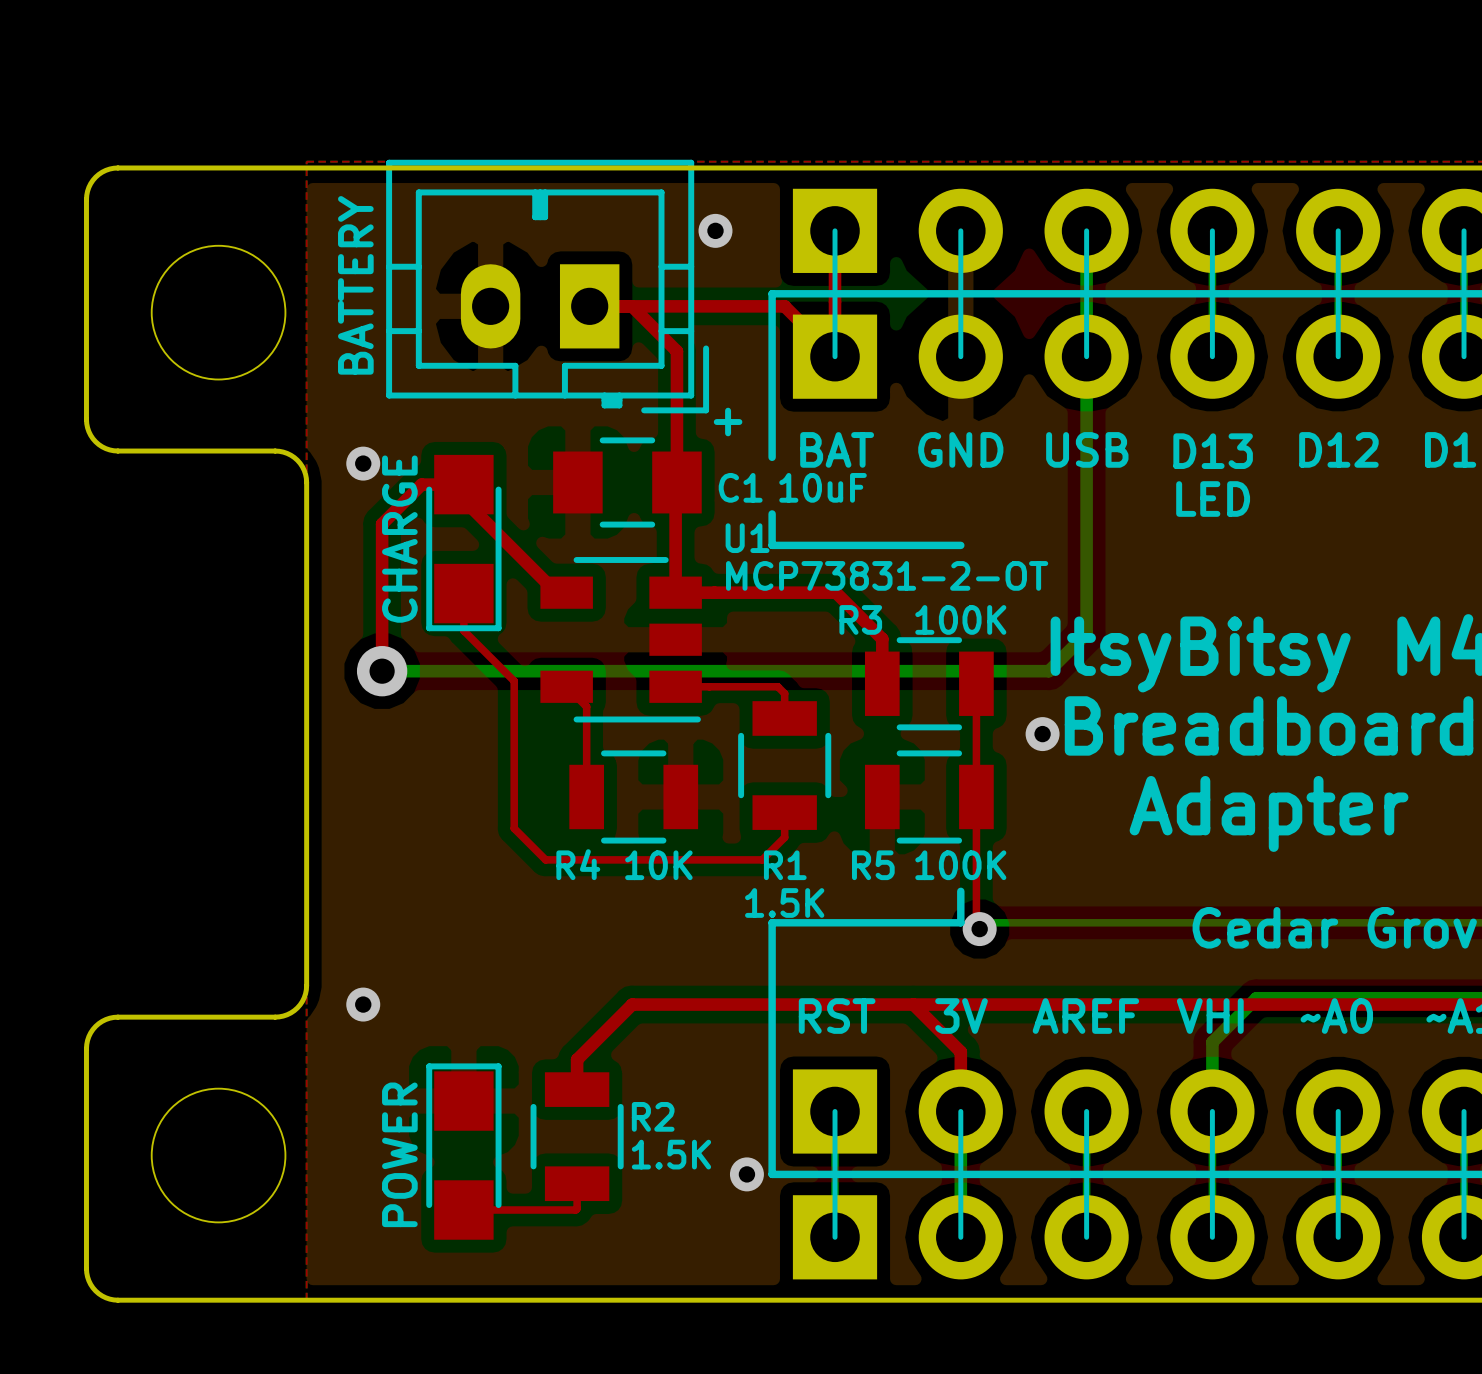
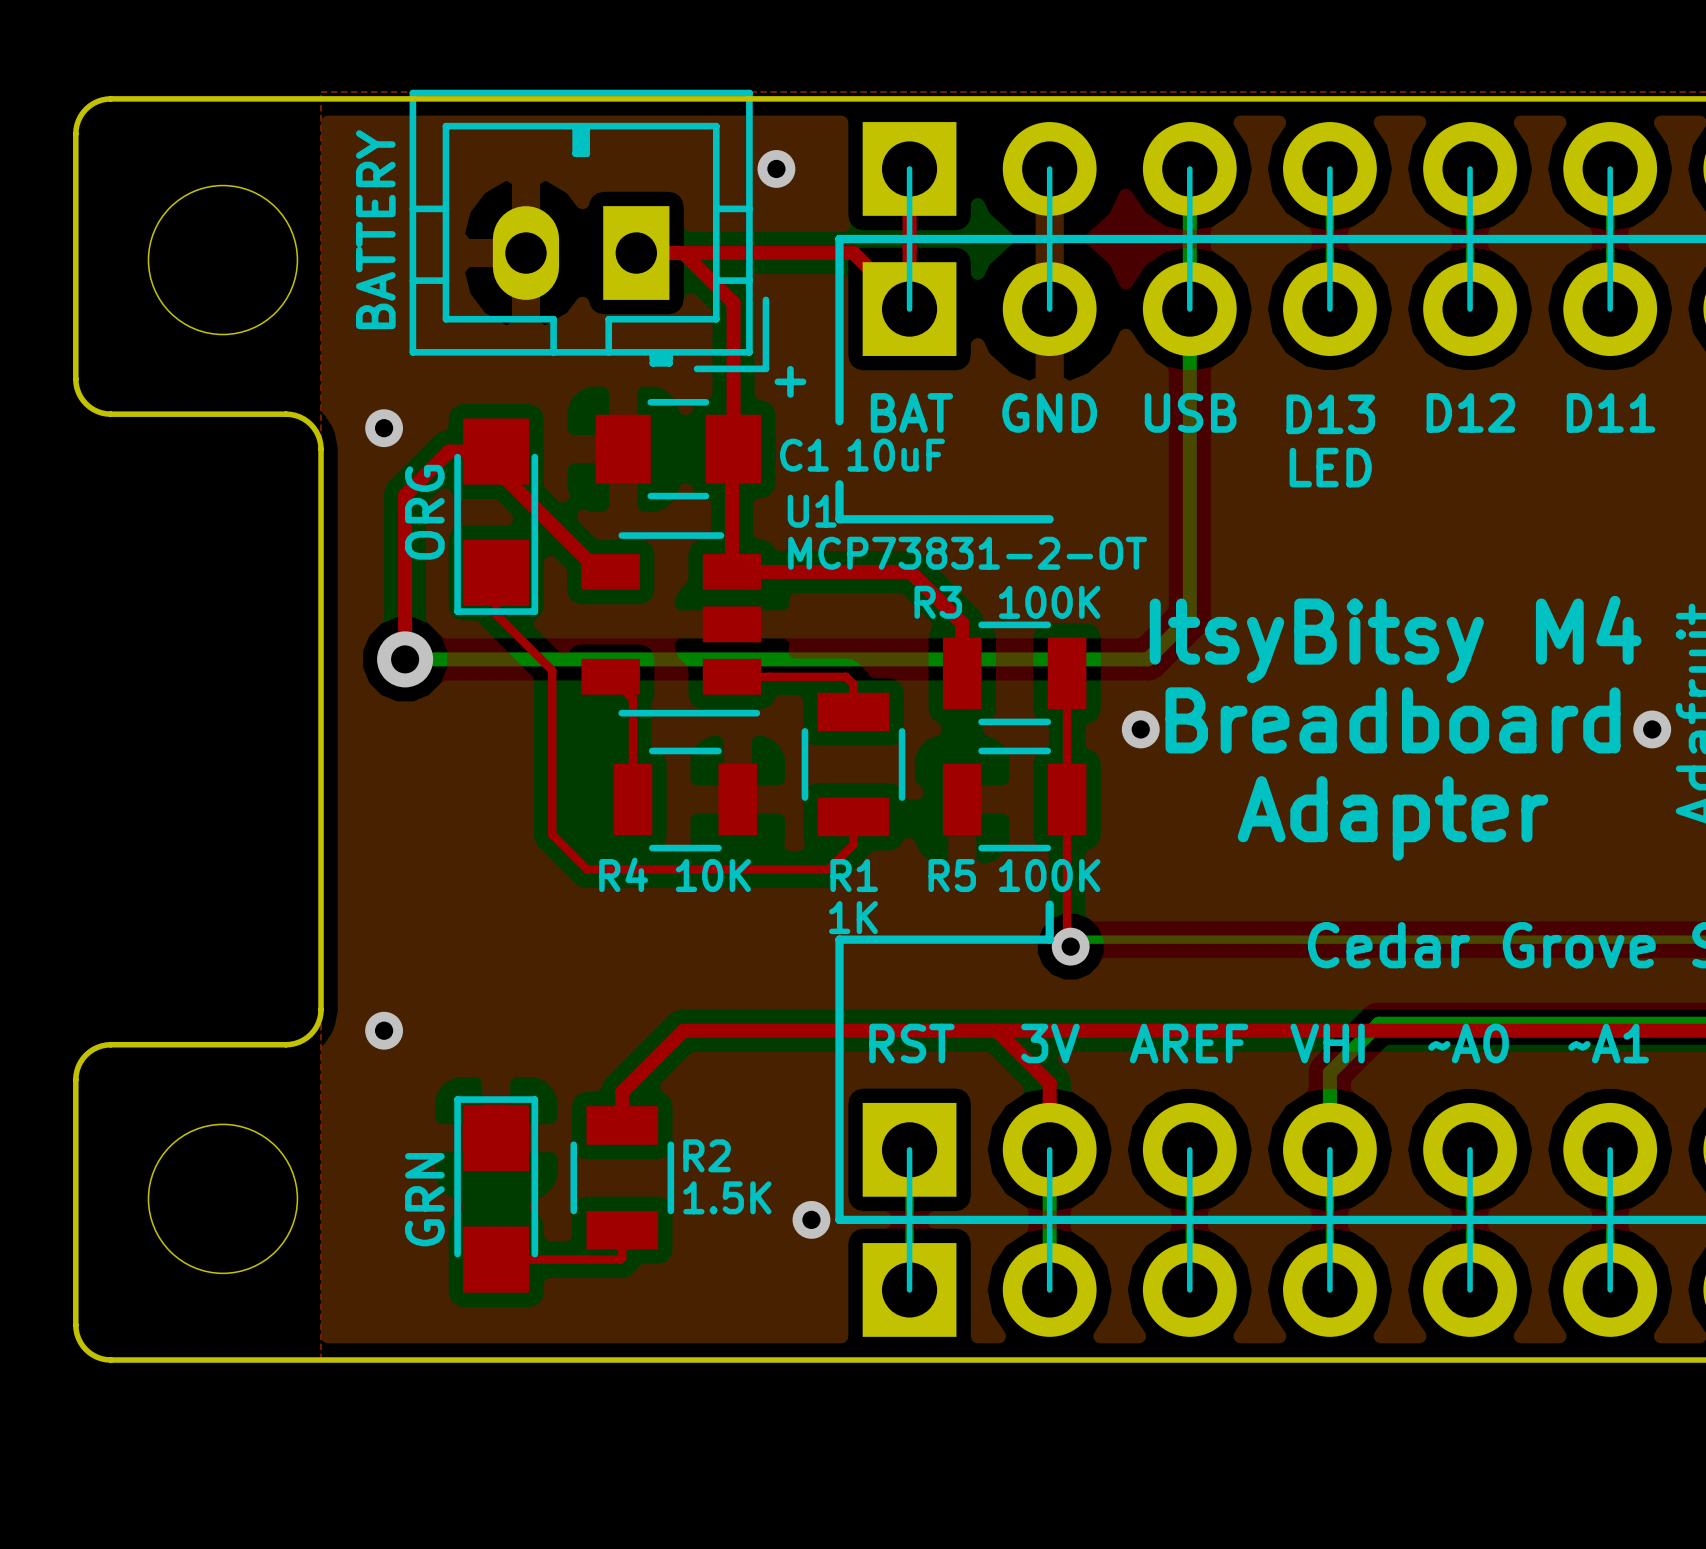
part value: CHARGE (399, 539) -> ORG (424, 512)
R1 value: 1.5K (784, 902) -> 1K (853, 917)
part value: POWER (399, 1154) -> GRN (424, 1199)

